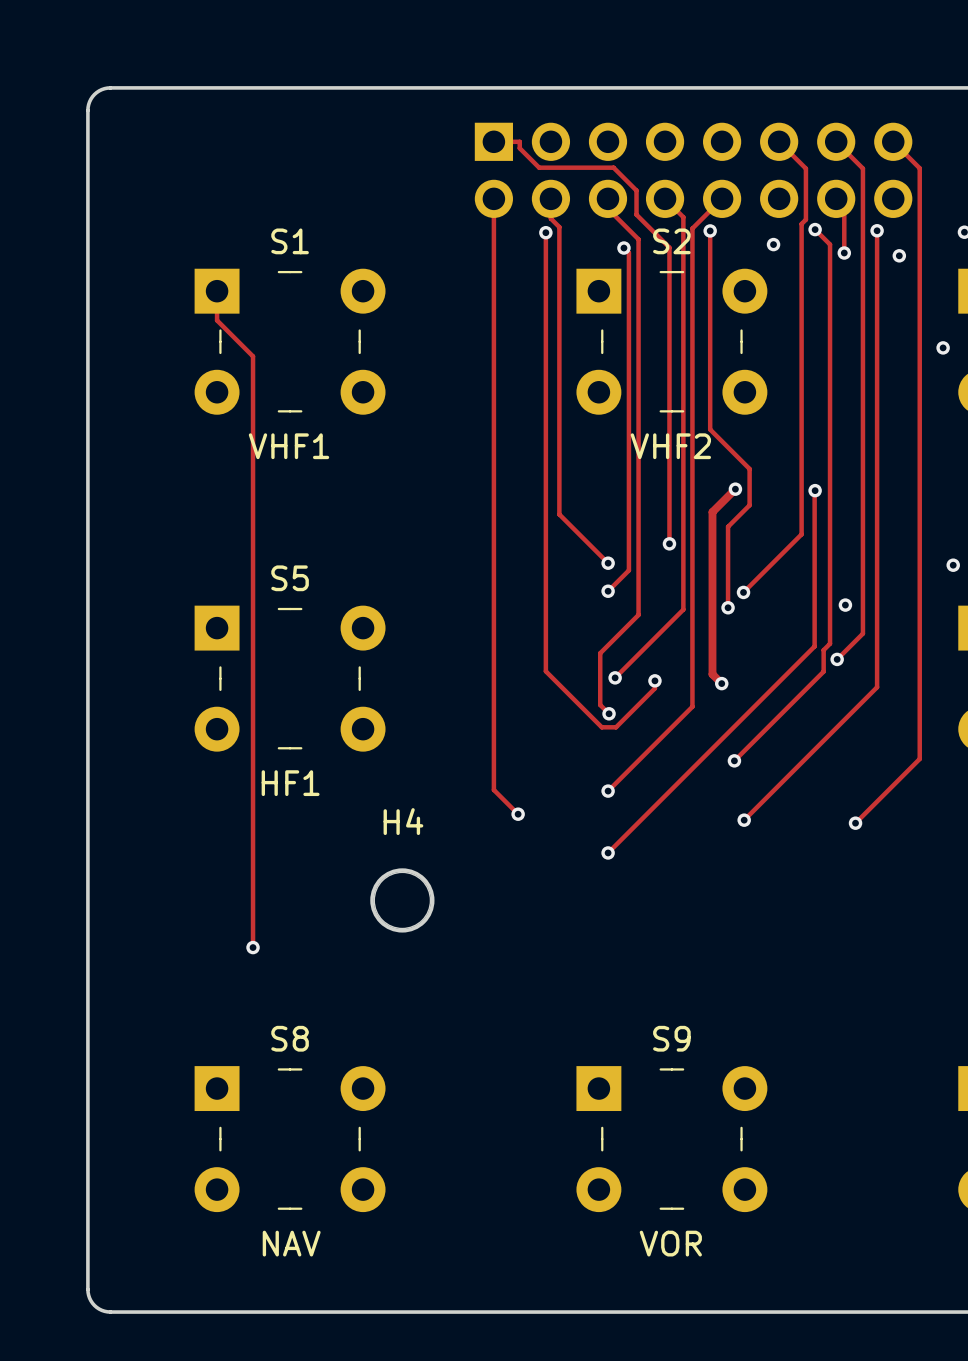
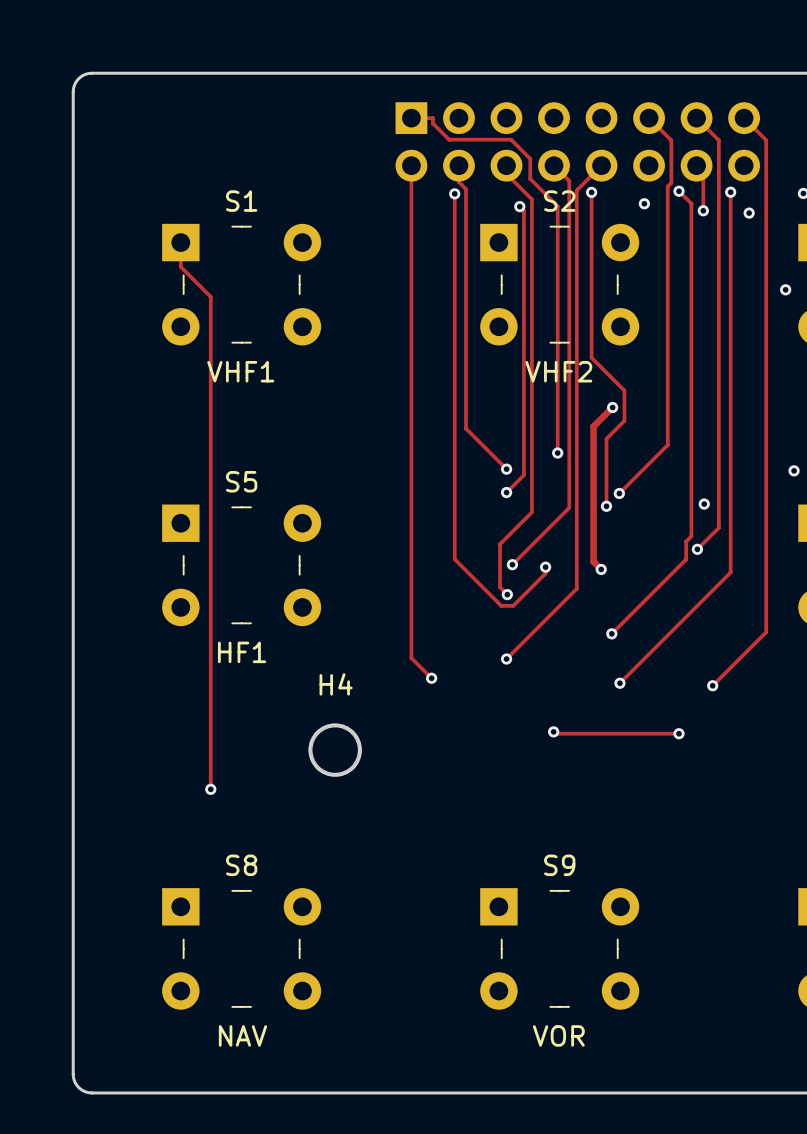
track: (815, 490) (814, 646) (608, 852) -> none
via: (815, 490) -> none
via position: (608, 852) -> (553, 731)
track: none -> (553, 731) (555, 733) (679, 733)
via: none -> (679, 733)

